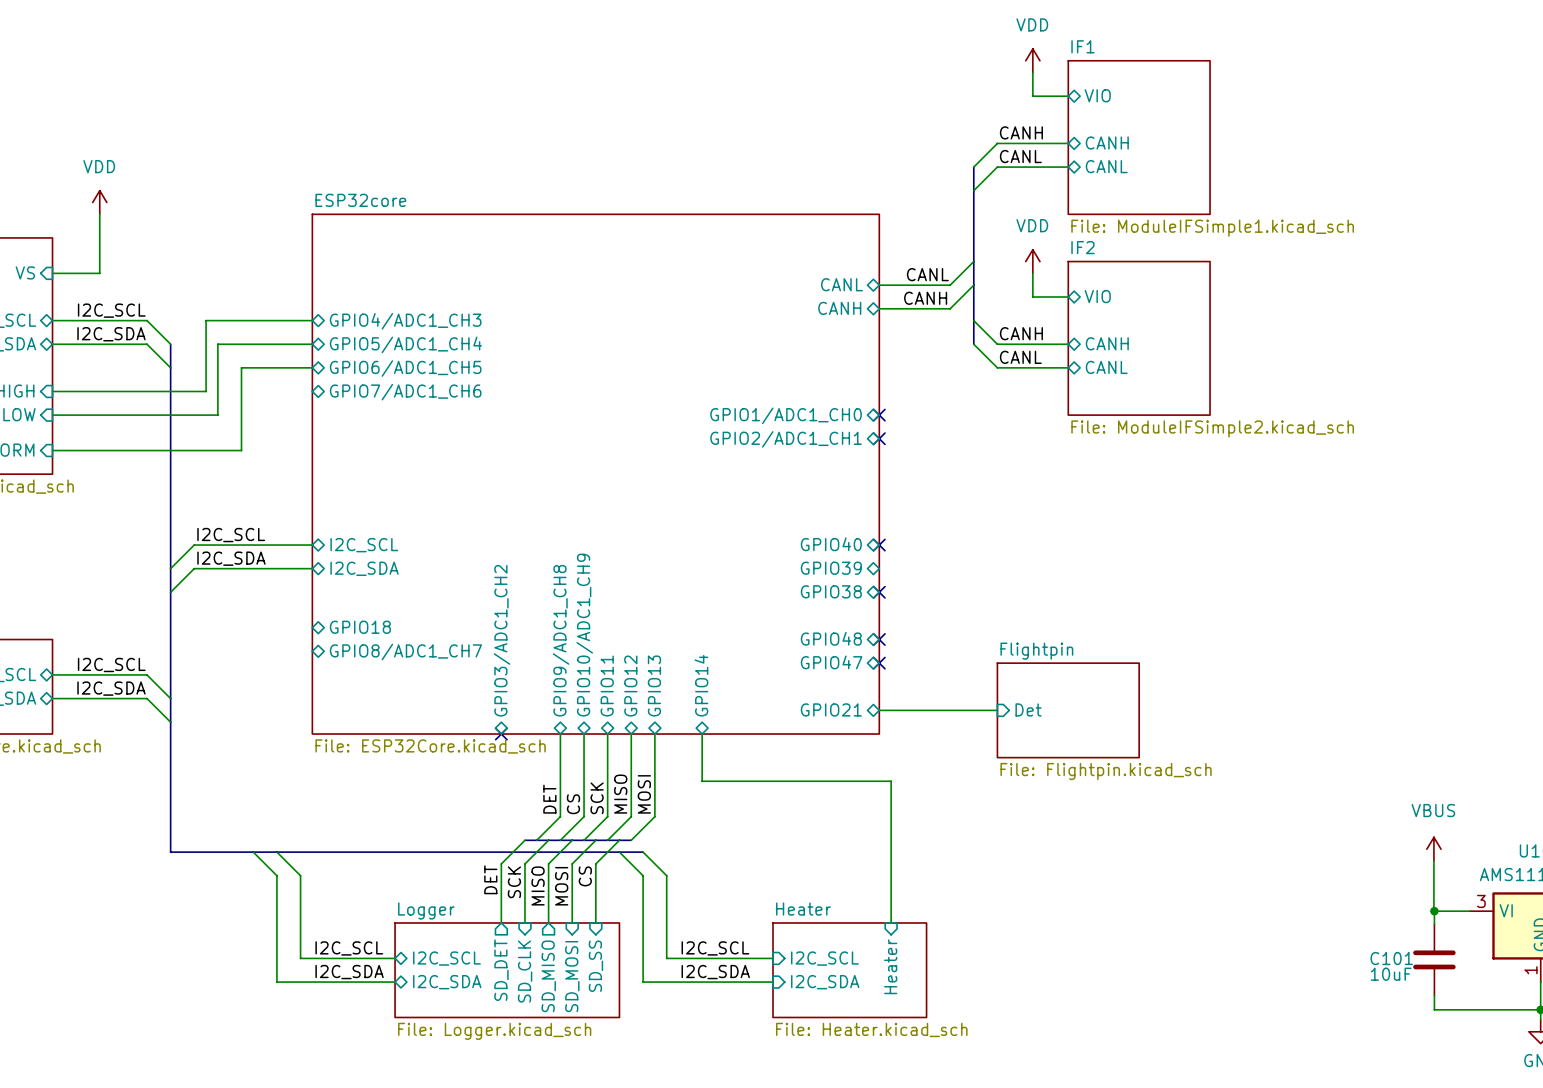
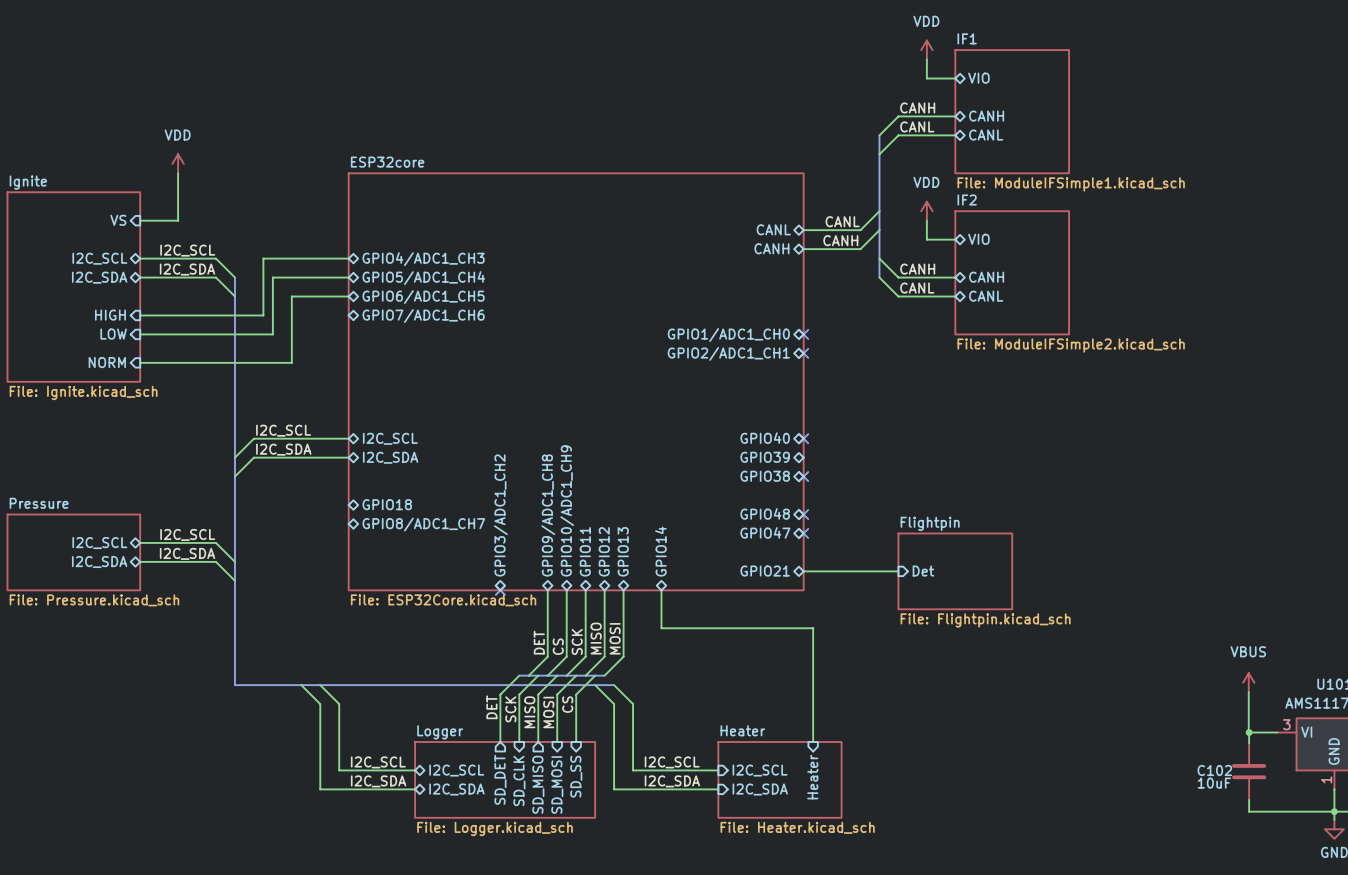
C101 name: C101 (1391, 958) -> C102 (1214, 770)

